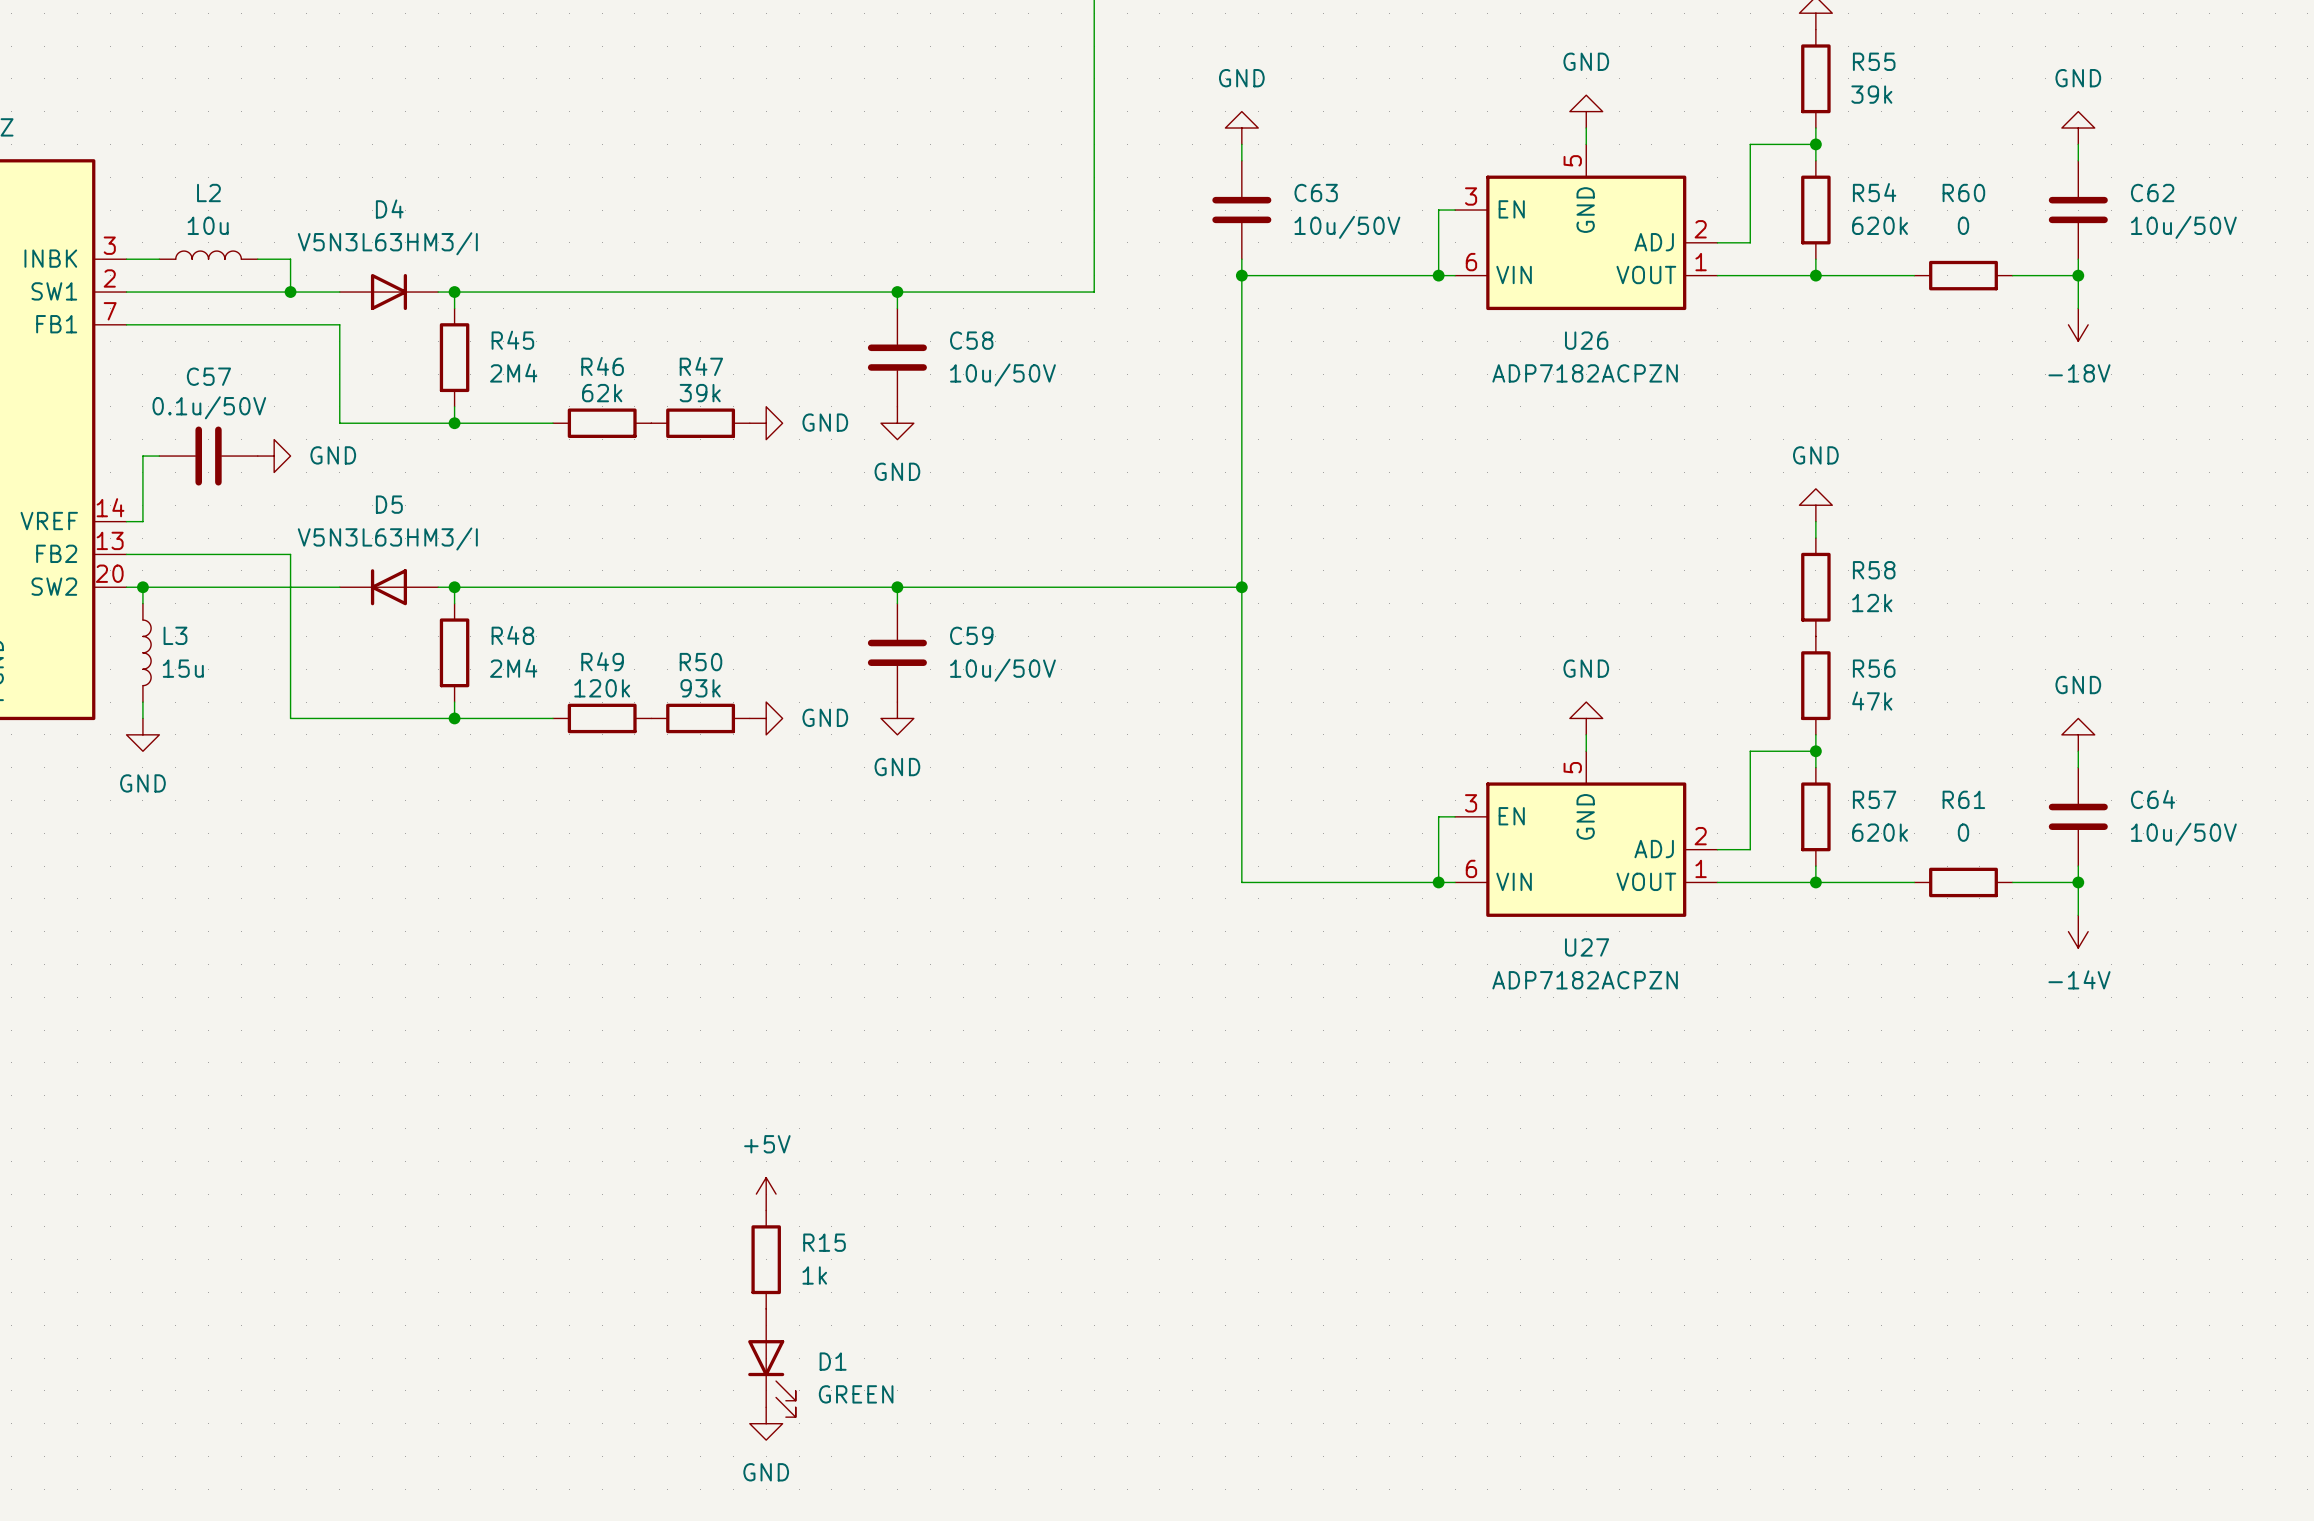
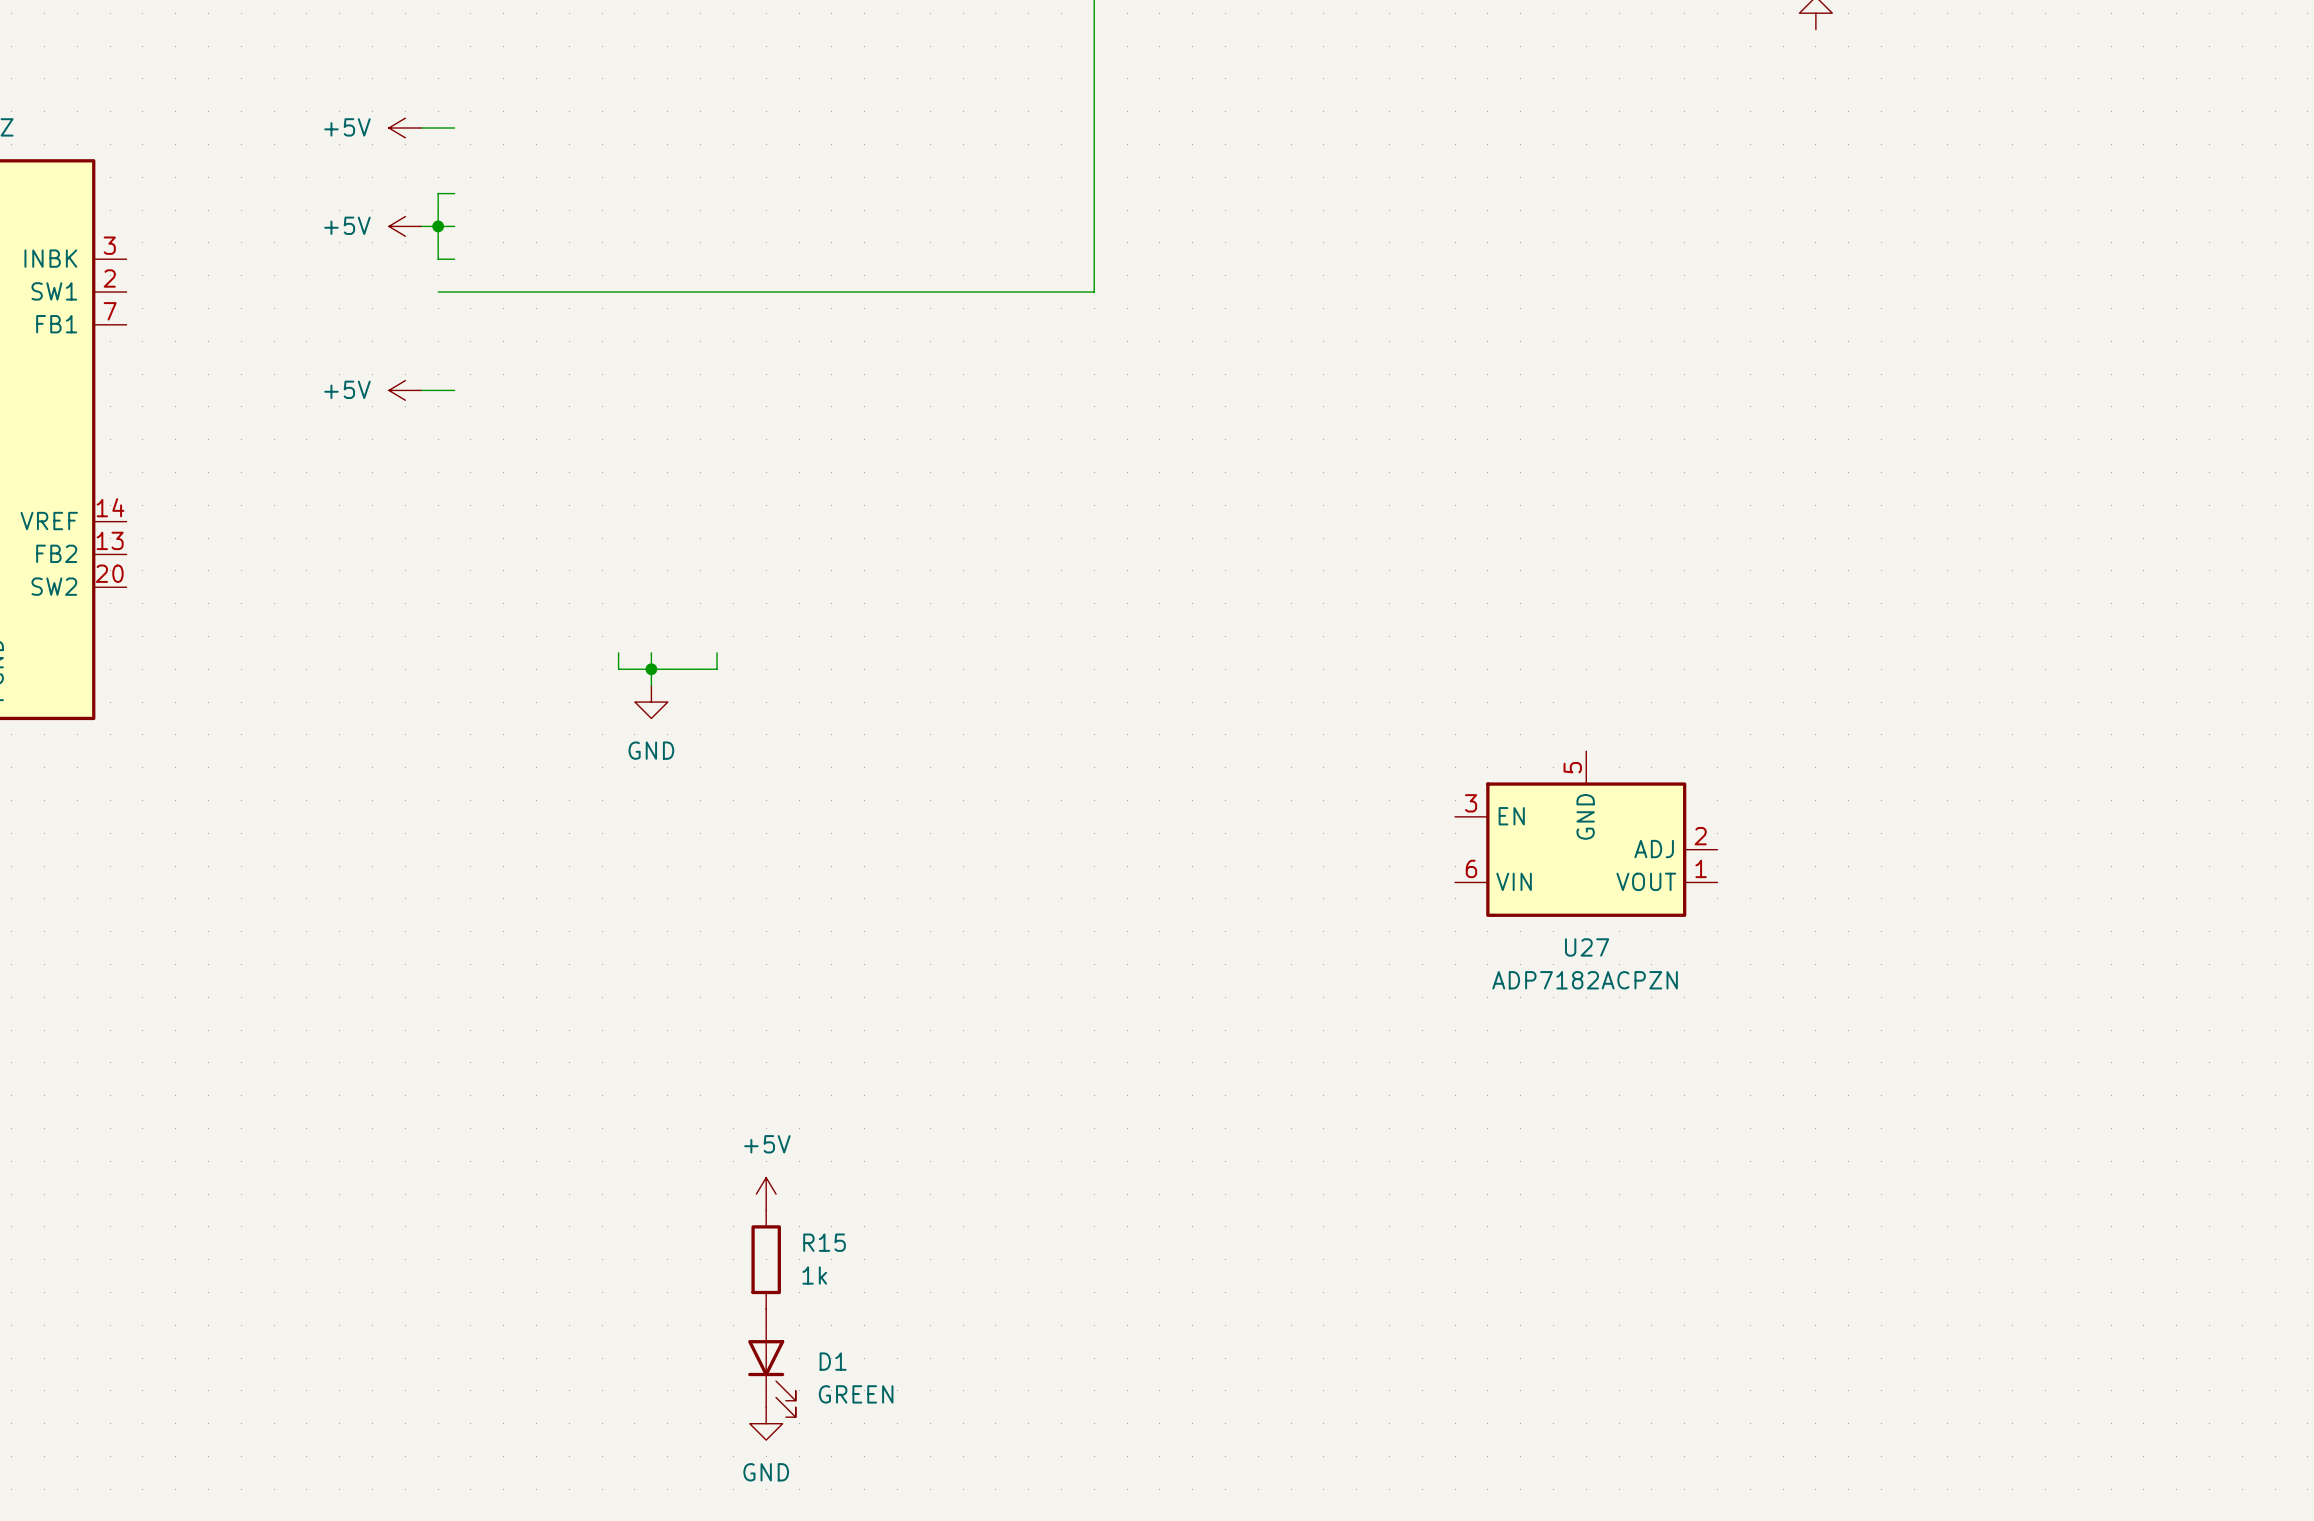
R55: 39k (1815, 78) -> none
power symbol: GND (1586, 111) -> none
power symbol: none -> +5V (405, 128)
wire: none -> (421, 128) (454, 128)
power symbol: GND (1241, 128) -> none
wire: (1586, 128) (1586, 144) -> none
wire: (1815, 128) (1815, 160) -> none
power symbol: GND (2078, 128) -> none
wire: (1241, 144) (1241, 160) -> none
wire: (1815, 144) (1750, 144) (1750, 242) (1717, 242) -> none
junction: (1815, 144) -> none
wire: (2078, 144) (2078, 160) -> none
wire: none -> (454, 193) (438, 193) (438, 259) (454, 259)
C63: 10u/50V (1241, 210) -> none
wire: (1455, 210) (1438, 210) (1438, 275) -> none
R54: 620k (1815, 210) -> none
C62: 10u/50V (2078, 210) -> none
power symbol: none -> +5V (405, 226)
U26: ADP7182ACPZN (1586, 227) -> none
L2: 10u (208, 255) -> none
wire: (126, 259) (159, 259) -> (421, 226) (454, 226)
wire: (257, 259) (290, 259) (290, 292) -> none
wire: (1241, 259) (1241, 882) (1455, 882) -> none
wire: (1815, 259) (1815, 275) -> none
wire: (2078, 259) (2078, 308) -> none
wire: (1241, 275) (1455, 275) -> none
junction: (1241, 275) -> none
junction: (1438, 275) -> none
wire: (1717, 275) (1914, 275) -> none
junction: (1815, 275) -> none
R60: 0 (1963, 275) -> none
wire: (2012, 275) (2078, 275) -> none
junction: (2078, 275) -> none
wire: (126, 292) (339, 292) -> none
junction: (290, 292) -> none
D4: V5N3L63HM3/I (388, 292) -> none
wire: (454, 292) (454, 308) -> none
junction position: (454, 292) -> (438, 226)
wire: (897, 292) (897, 308) -> none
junction: (897, 292) -> none
wire: (126, 324) (339, 324) (339, 423) (552, 423) -> none
power symbol: -18V (2078, 324) -> none
R45: 2M4 (454, 357) -> none
C58: 10u/50V (897, 357) -> none
power symbol: none -> +5V (405, 390)
wire: none -> (421, 390) (454, 390)
wire: (454, 406) (454, 423) -> none
junction: (454, 423) -> none
R46: 62k (602, 423) -> none
R47: 39k (700, 423) -> none
power symbol: GND (766, 423) -> none
power symbol: GND (897, 423) -> none
wire: (159, 456) (142, 456) (142, 521) (126, 521) -> none
C57: 0.1u/50V (208, 456) -> none
power symbol: GND (274, 456) -> none
power symbol: GND (1815, 505) -> none
wire: (1815, 521) (1815, 538) -> none
wire: (126, 554) (290, 554) (290, 718) (552, 718) -> none
wire: (126, 587) (339, 587) -> none
wire: (142, 587) (142, 603) -> none
junction: (142, 587) -> none
D5: V5N3L63HM3/I (388, 587) -> none
wire: (438, 587) (1241, 587) -> none
wire: (454, 587) (454, 603) -> none
junction: (454, 587) -> none
wire: (897, 587) (897, 603) -> none
junction: (897, 587) -> none
junction: (1241, 587) -> none
R58: 12k (1815, 587) -> none
L3: 15u (147, 652) -> none
R48: 2M4 (454, 652) -> none
wire: none -> (618, 652) (618, 669) (716, 669) (716, 652)
wire: none -> (651, 652) (651, 685)
C59: 10u/50V (897, 652) -> none
junction: none -> (651, 669)
R56: 47k (1815, 685) -> none
wire: (142, 702) (142, 718) -> none
wire: (454, 702) (454, 718) -> none
junction: (454, 718) -> none
R49: 120k (602, 718) -> none
R50: 93k (700, 718) -> none
power symbol rotation: 0° (766, 718) -> 90° clockwise (651, 702)
power symbol position: GND (766, 718) -> GND (651, 702)
power symbol: GND (897, 718) -> none
power symbol: GND (1586, 718) -> none
power symbol: GND (142, 734) -> none
wire: (1586, 734) (1586, 751) -> none
wire: (1815, 734) (1815, 767) -> none
power symbol: GND (2078, 734) -> none
wire: (1815, 751) (1750, 751) (1750, 849) (1717, 849) -> none
junction: (1815, 751) -> none
wire: (2078, 751) (2078, 767) -> none
wire: (1455, 816) (1438, 816) (1438, 882) -> none
R57: 620k (1815, 816) -> none
C64: 10u/50V (2078, 816) -> none
wire: (1815, 866) (1815, 882) -> none
wire: (2078, 866) (2078, 915) -> none
junction: (1438, 882) -> none
wire: (1717, 882) (1914, 882) -> none
junction: (1815, 882) -> none
R61: 0 (1963, 882) -> none
wire: (2012, 882) (2078, 882) -> none
junction: (2078, 882) -> none
power symbol: -14V (2078, 931) -> none

